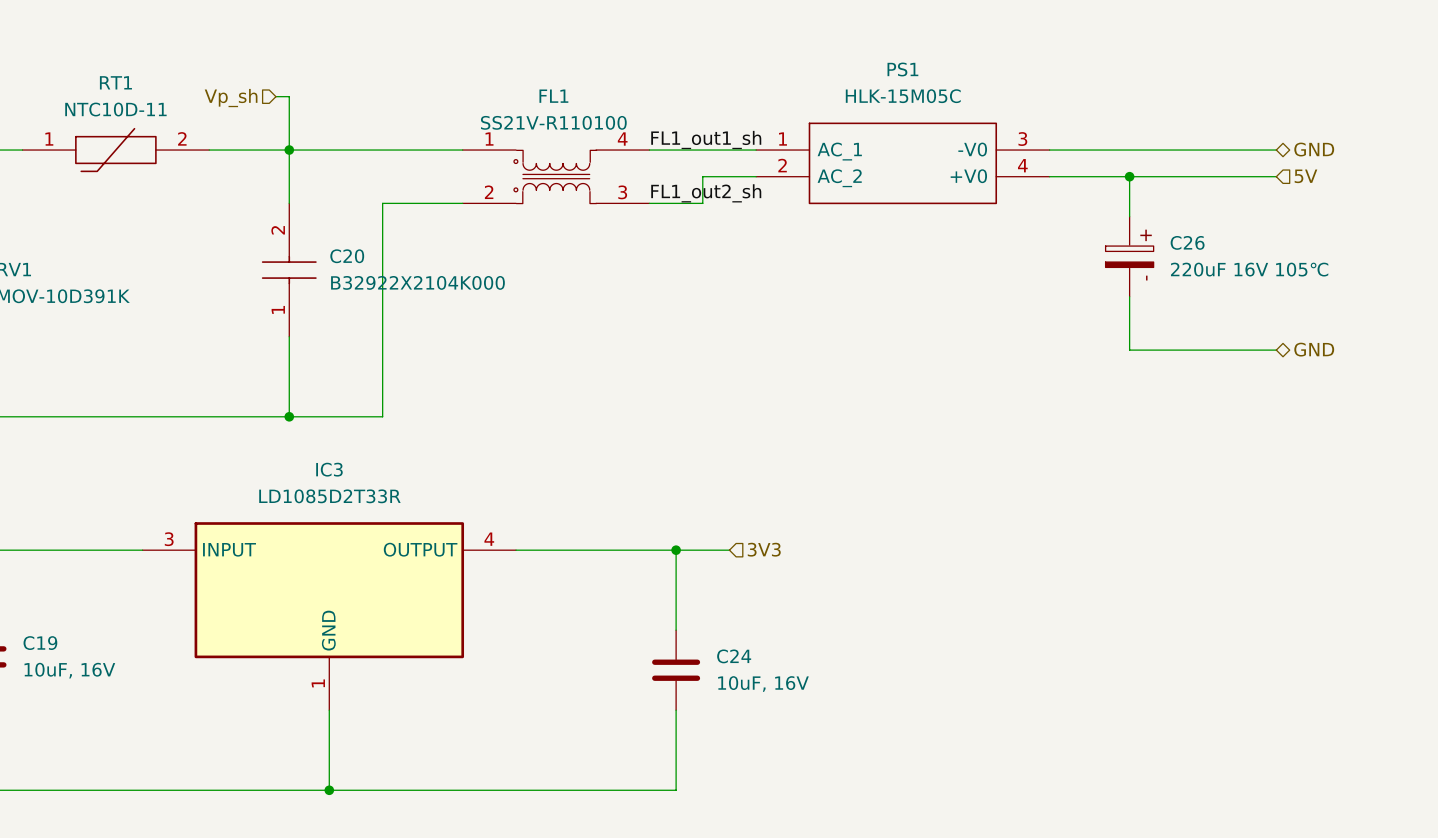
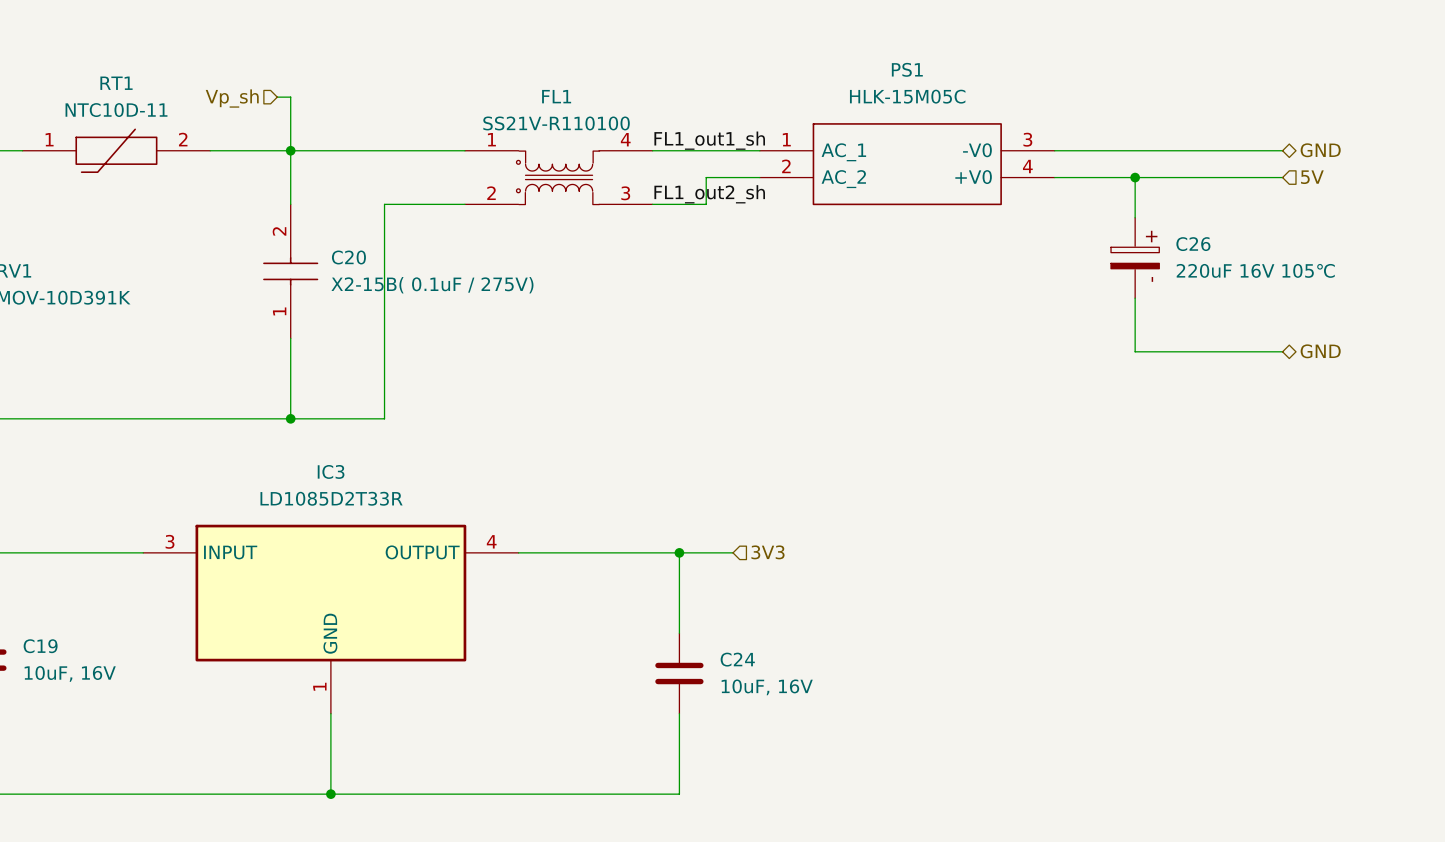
C20 value: B32922X2104K000 (417, 282) -> X2-15B( 0.1uF / 275V) (432, 285)

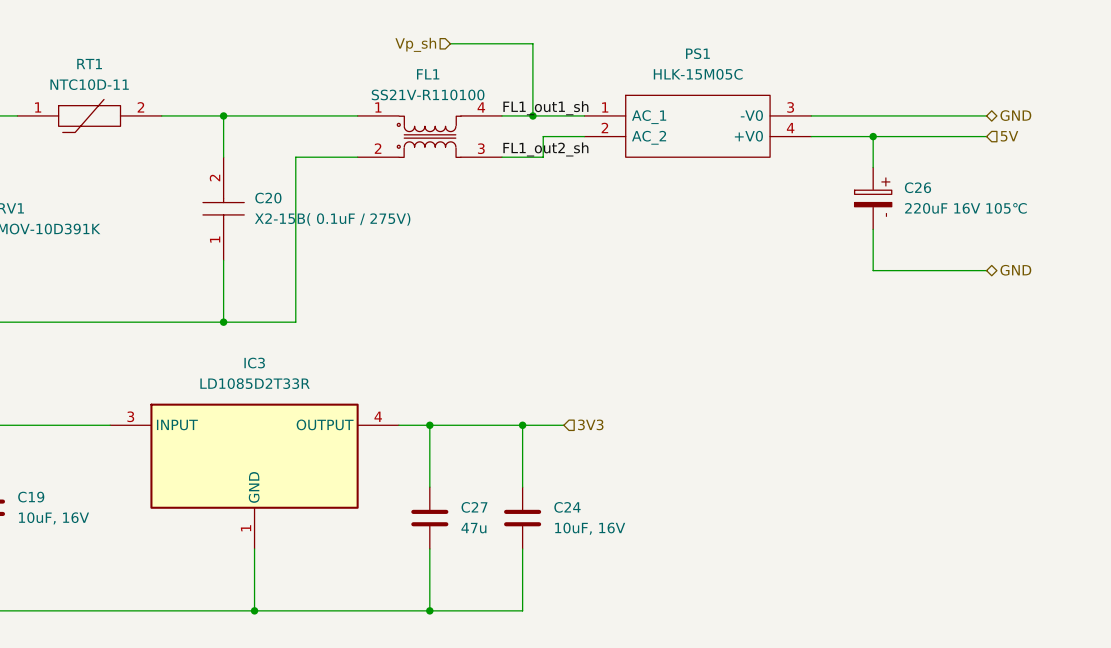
wire: none -> (450, 43) (532, 43) (532, 115)
hierarchical label: none -> Vp_sh (415, 44)
wire: (277, 97) (290, 97) (290, 150) -> none
hierarchical label: Vp_sh (232, 98) -> none
junction: none -> (532, 115)
wire: none -> (429, 425) (429, 487)
junction: none -> (429, 425)
C27: none -> 47u (429, 518)
wire: none -> (429, 549) (429, 610)
junction: none -> (429, 610)

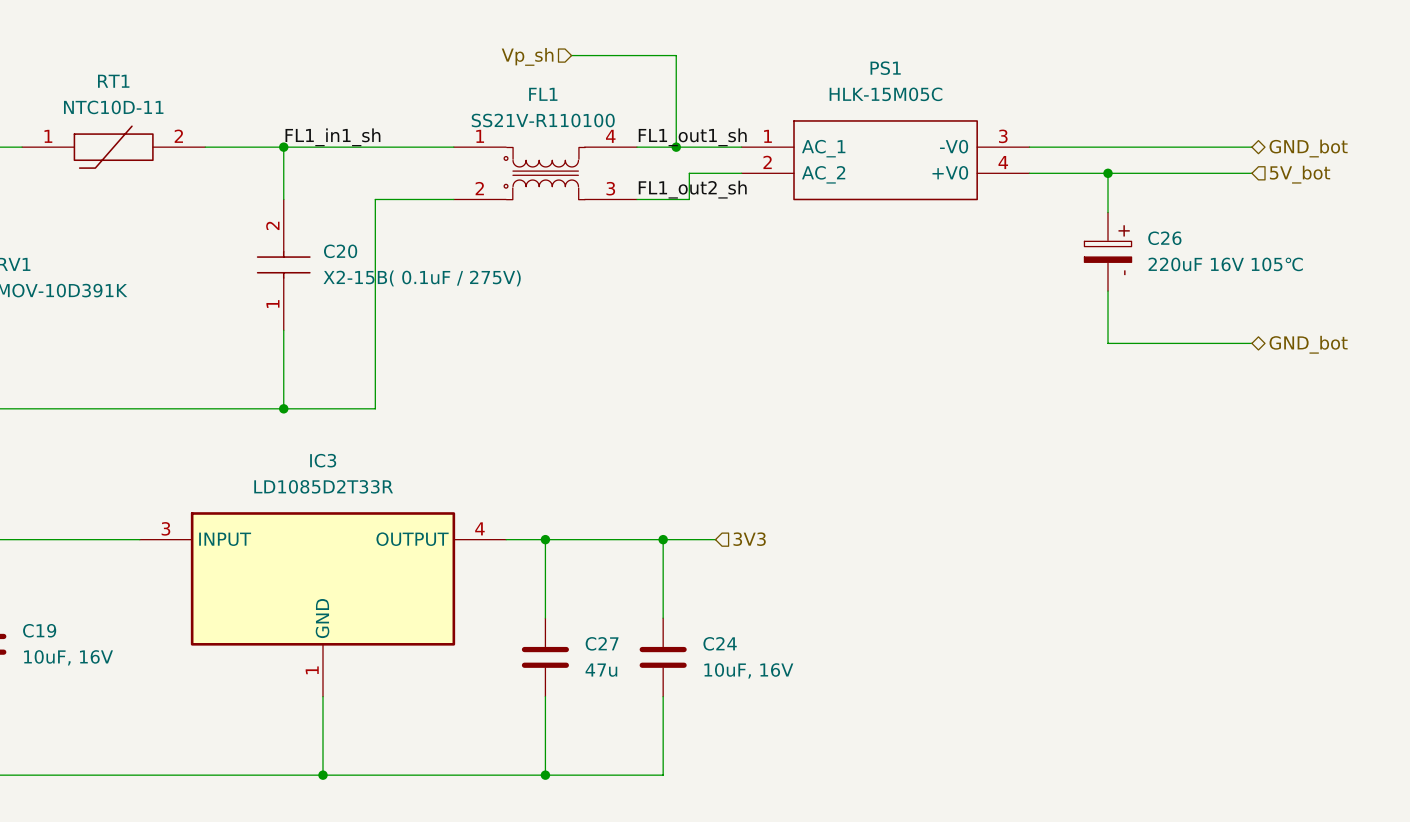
label: none -> FL1_in1_sh (332, 137)
hierarchical label: GND (1015, 115) -> GND_bot (1308, 148)
hierarchical label: 5V (1009, 136) -> 5V_bot (1300, 174)
hierarchical label: GND (1015, 270) -> GND_bot (1308, 344)

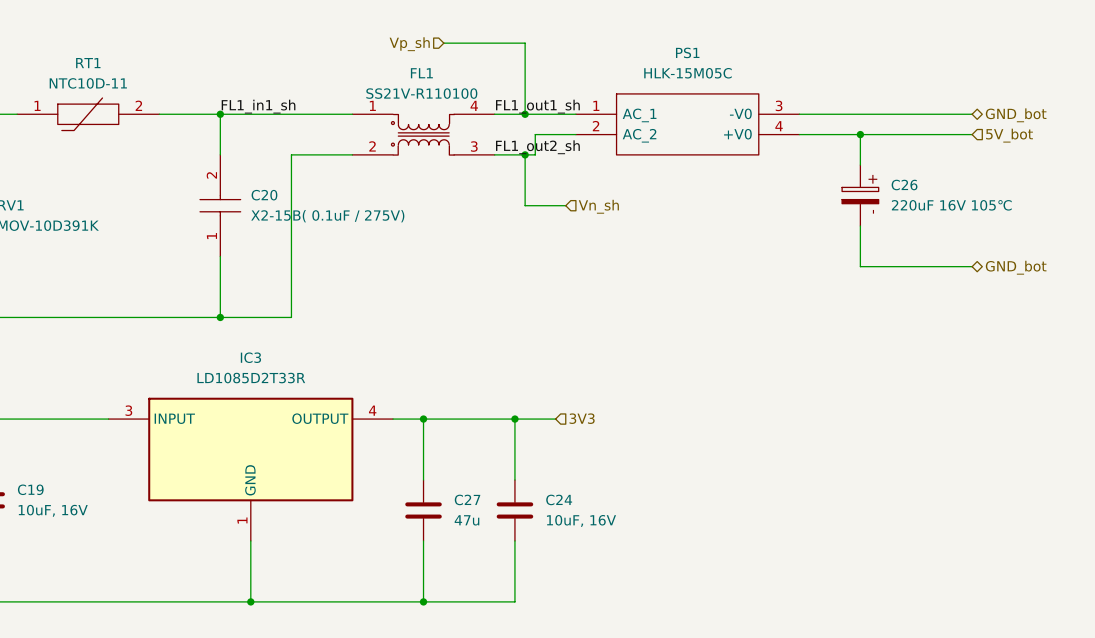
wire: none -> (525, 154) (525, 205) (565, 205)
junction: none -> (525, 154)
hierarchical label: none -> Vn_sh (598, 206)

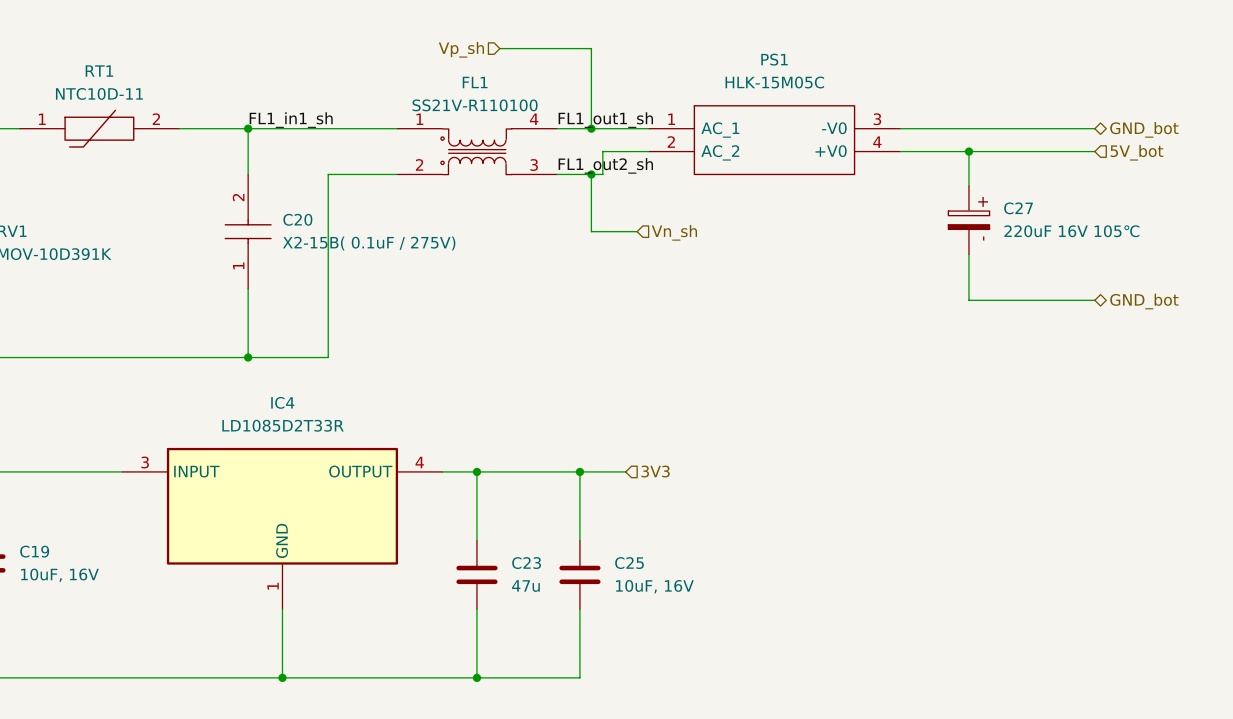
C26 name: C26 (904, 185) -> C27 (1018, 208)
IC3 name: IC3 (250, 357) -> IC4 (282, 402)
C27 name: C27 (467, 499) -> C23 (526, 563)
C24 name: C24 (559, 499) -> C25 (629, 563)

